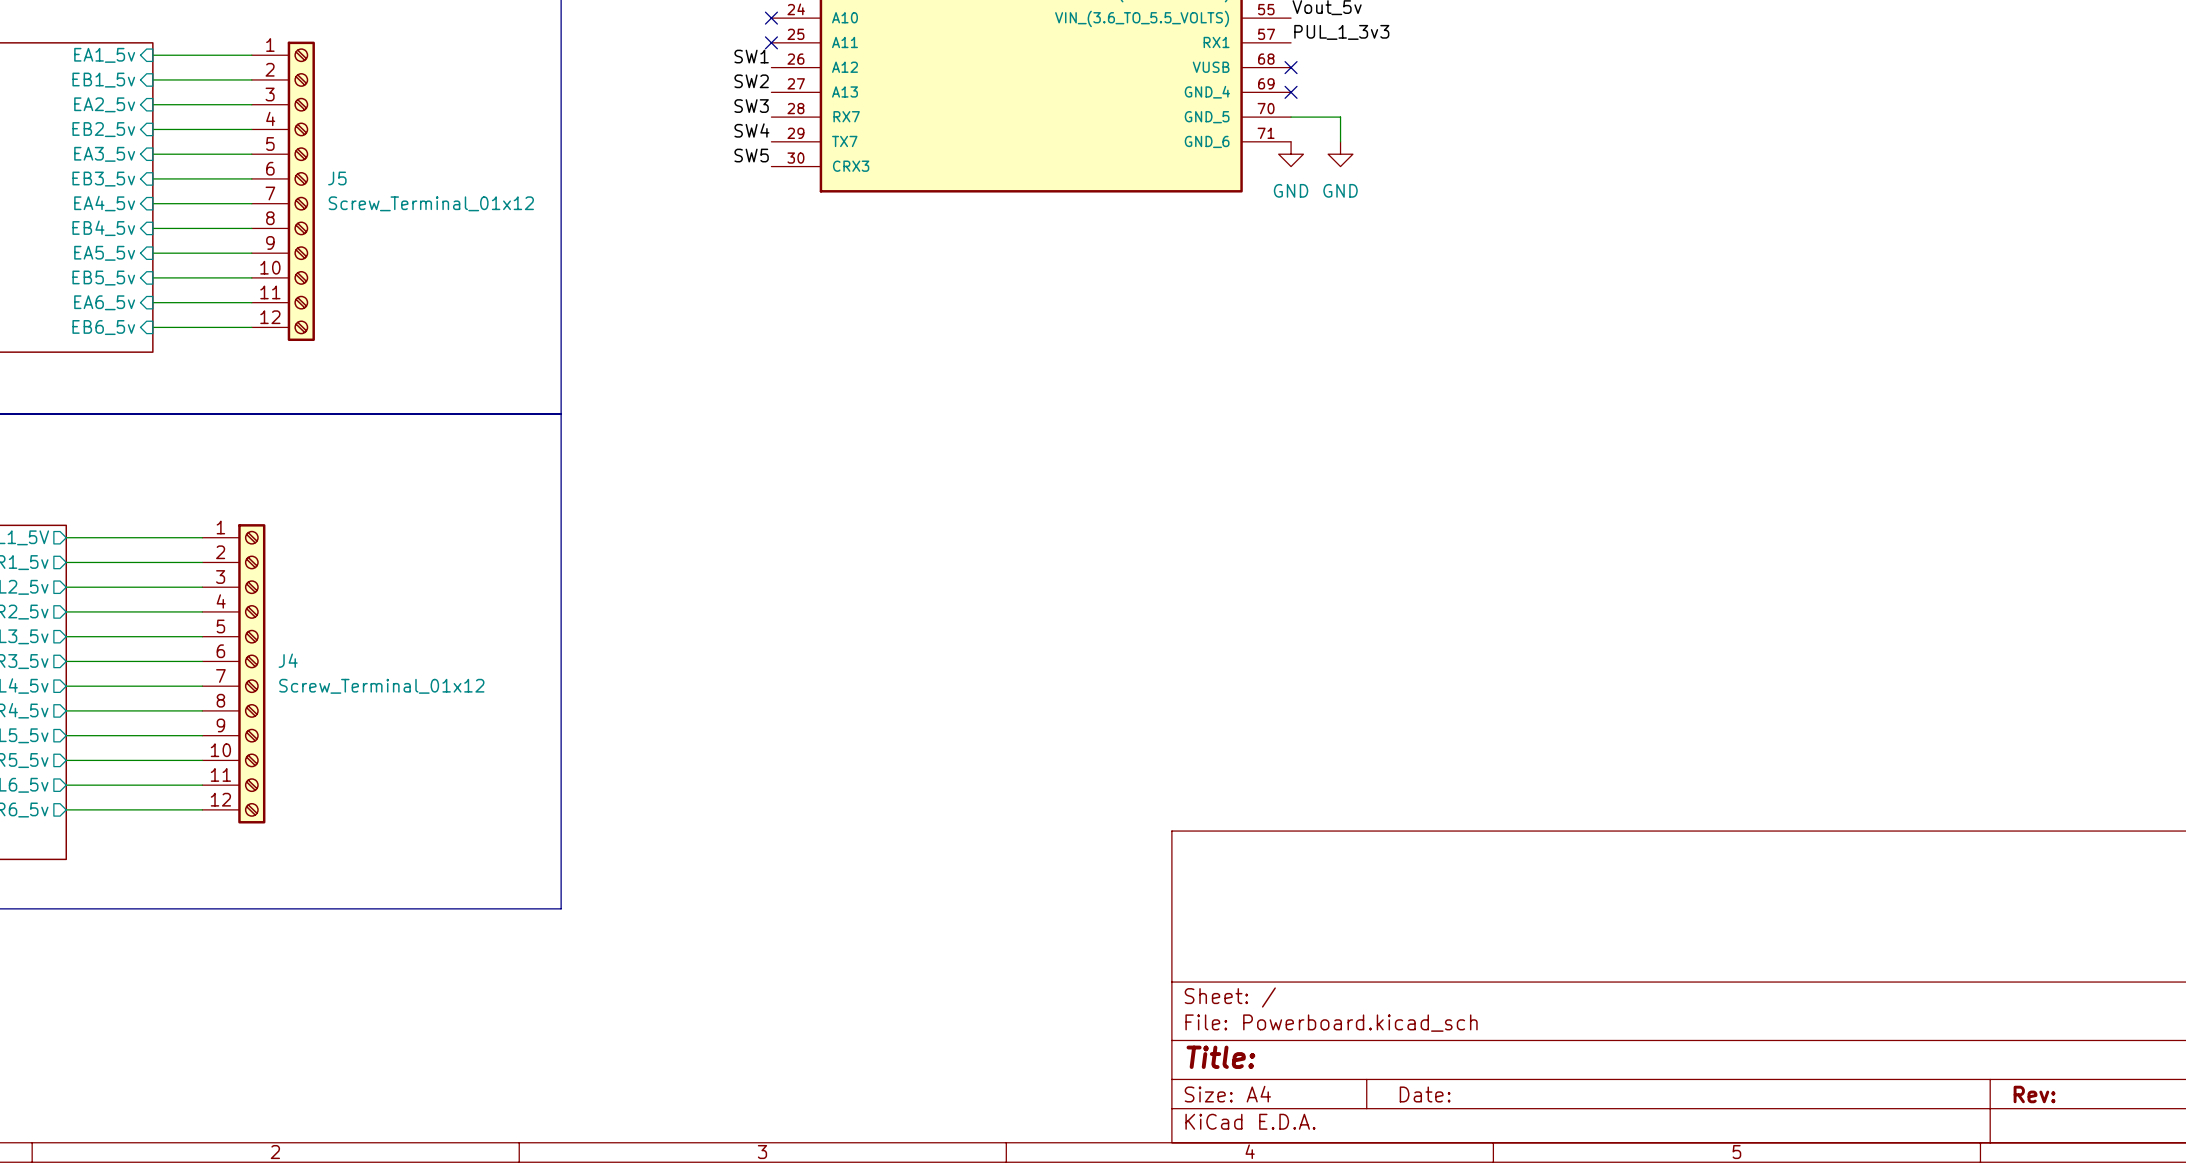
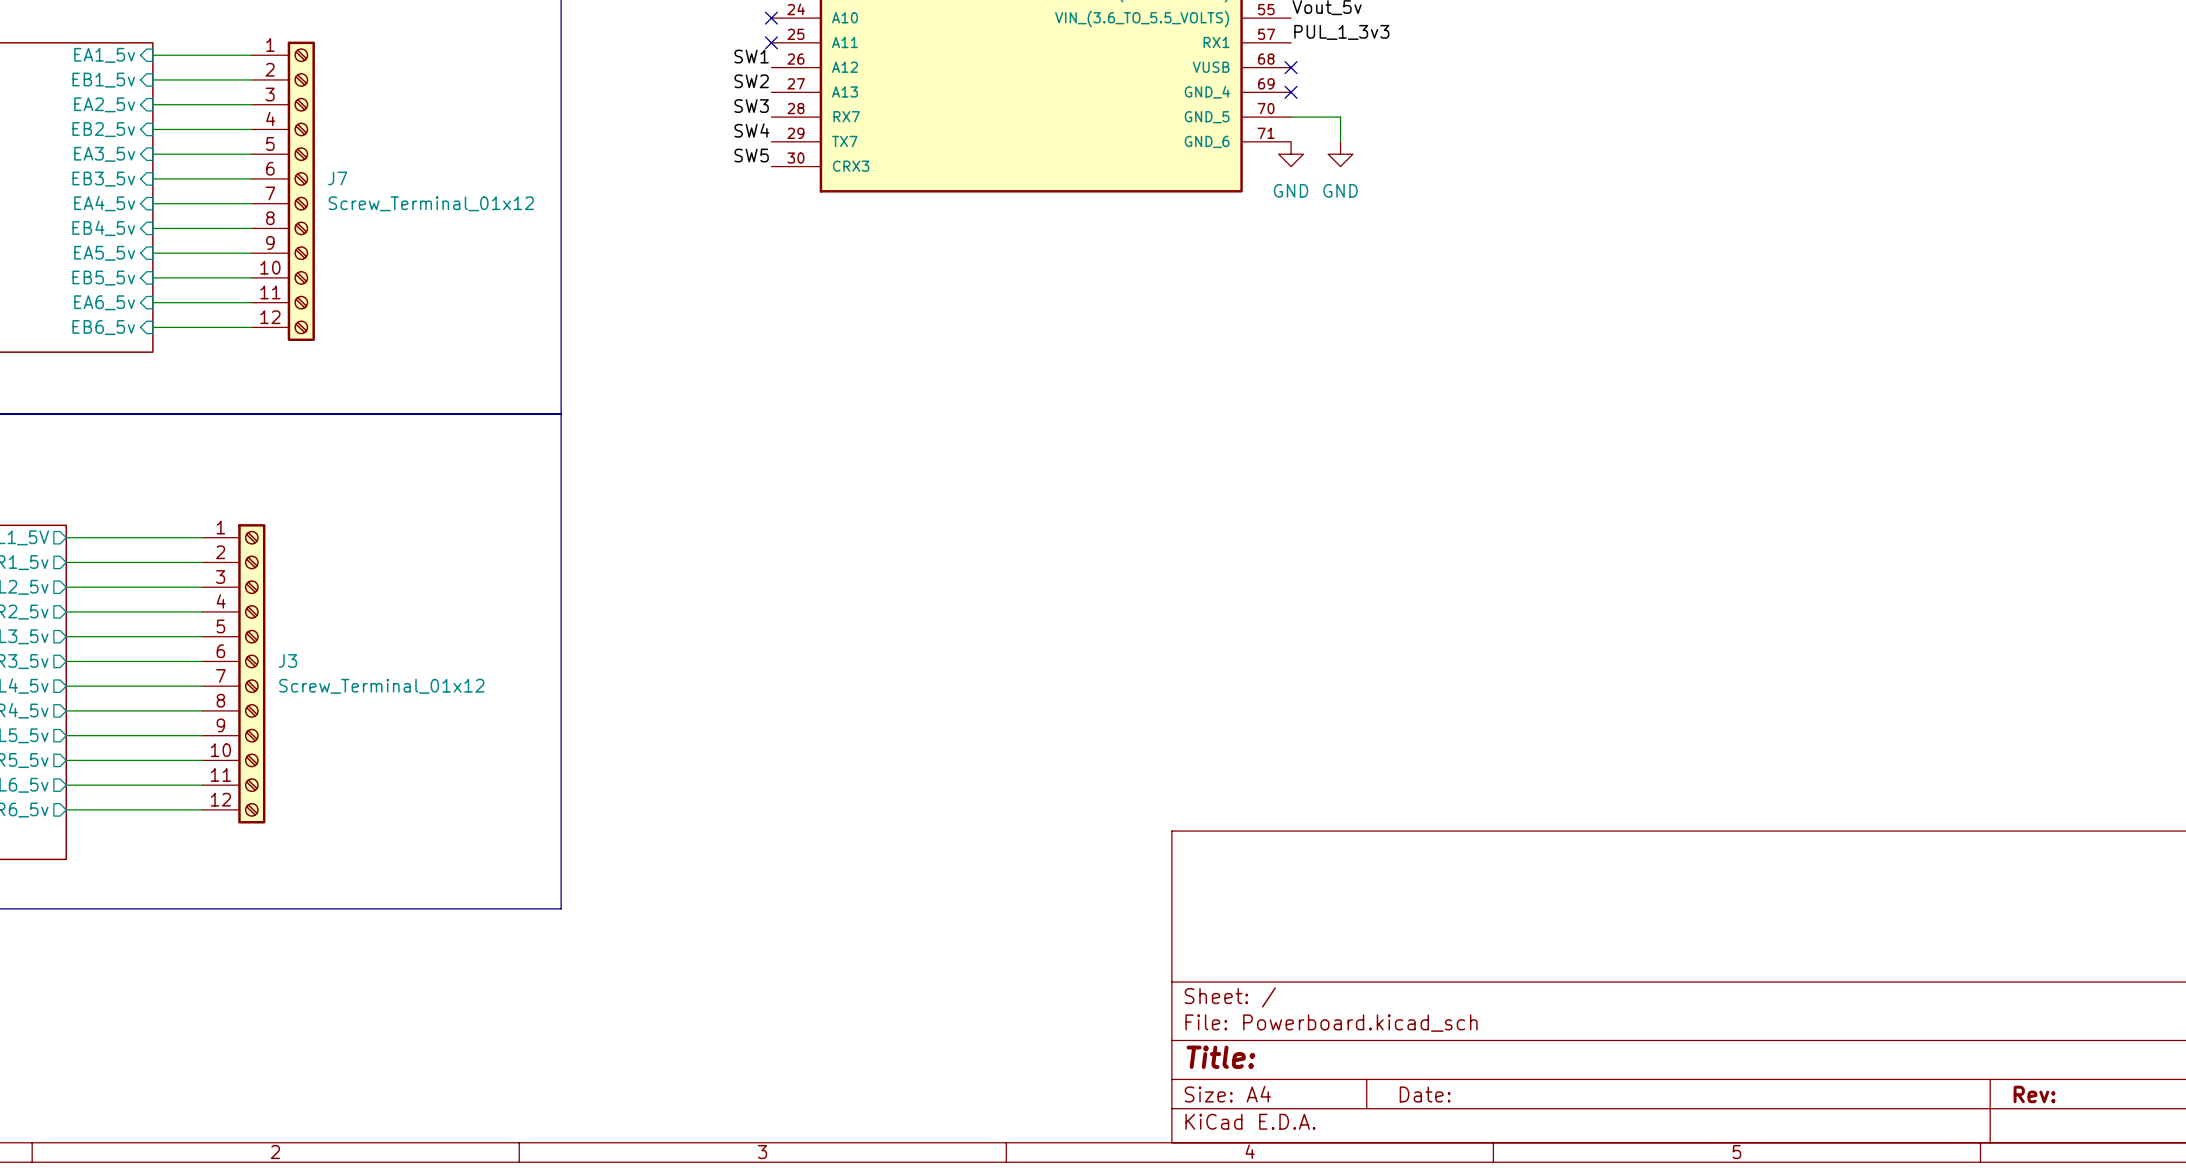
J5 name: J5 (337, 178) -> J7 (337, 178)
J4 name: J4 (288, 660) -> J3 (287, 660)

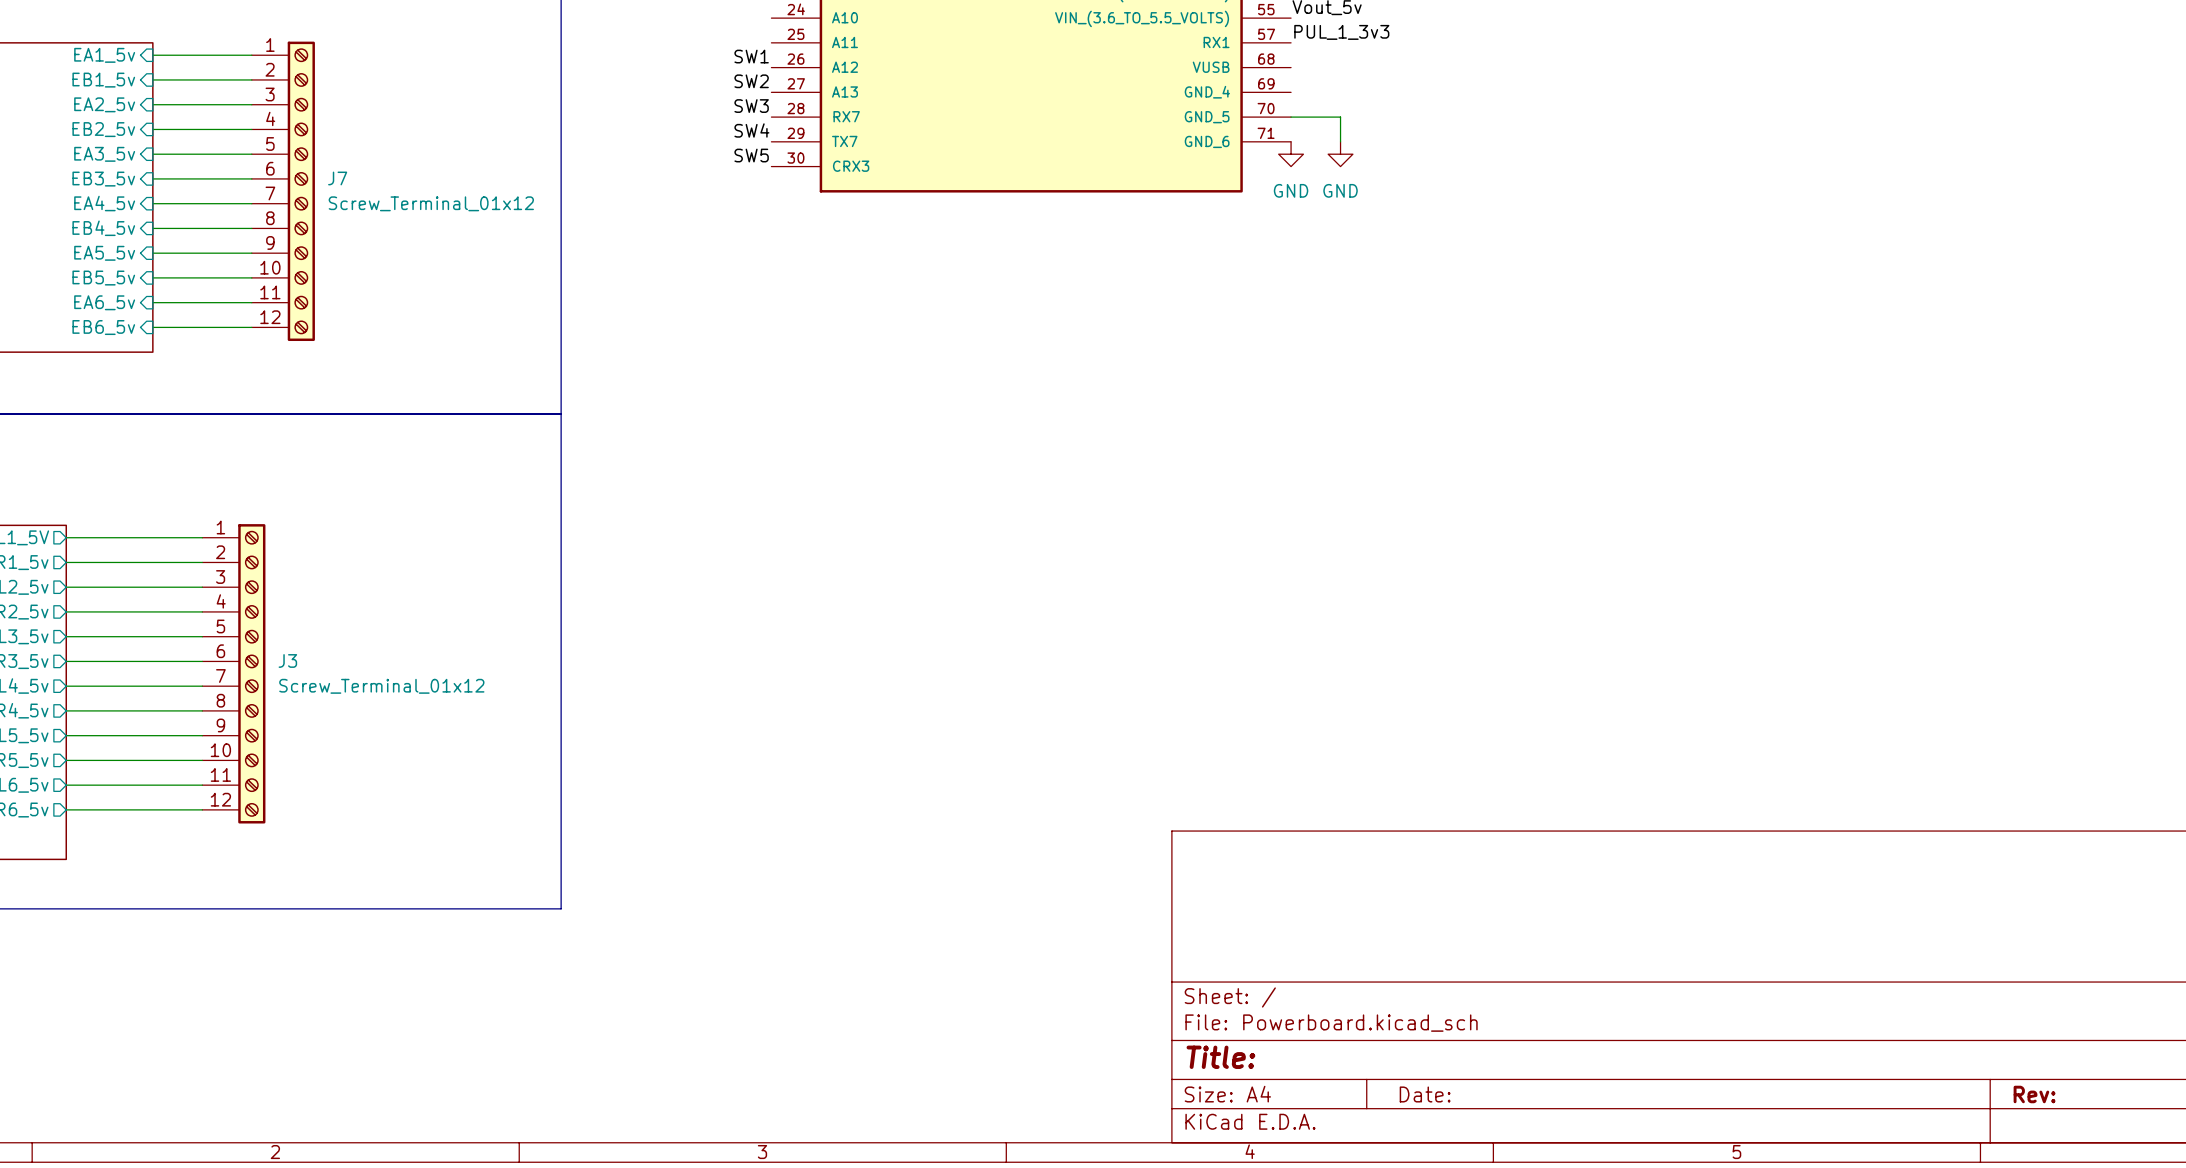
no-connect mark: (771, 18) -> none
no-connect mark: (771, 42) -> none
no-connect mark: (1291, 67) -> none
no-connect mark: (1291, 92) -> none

